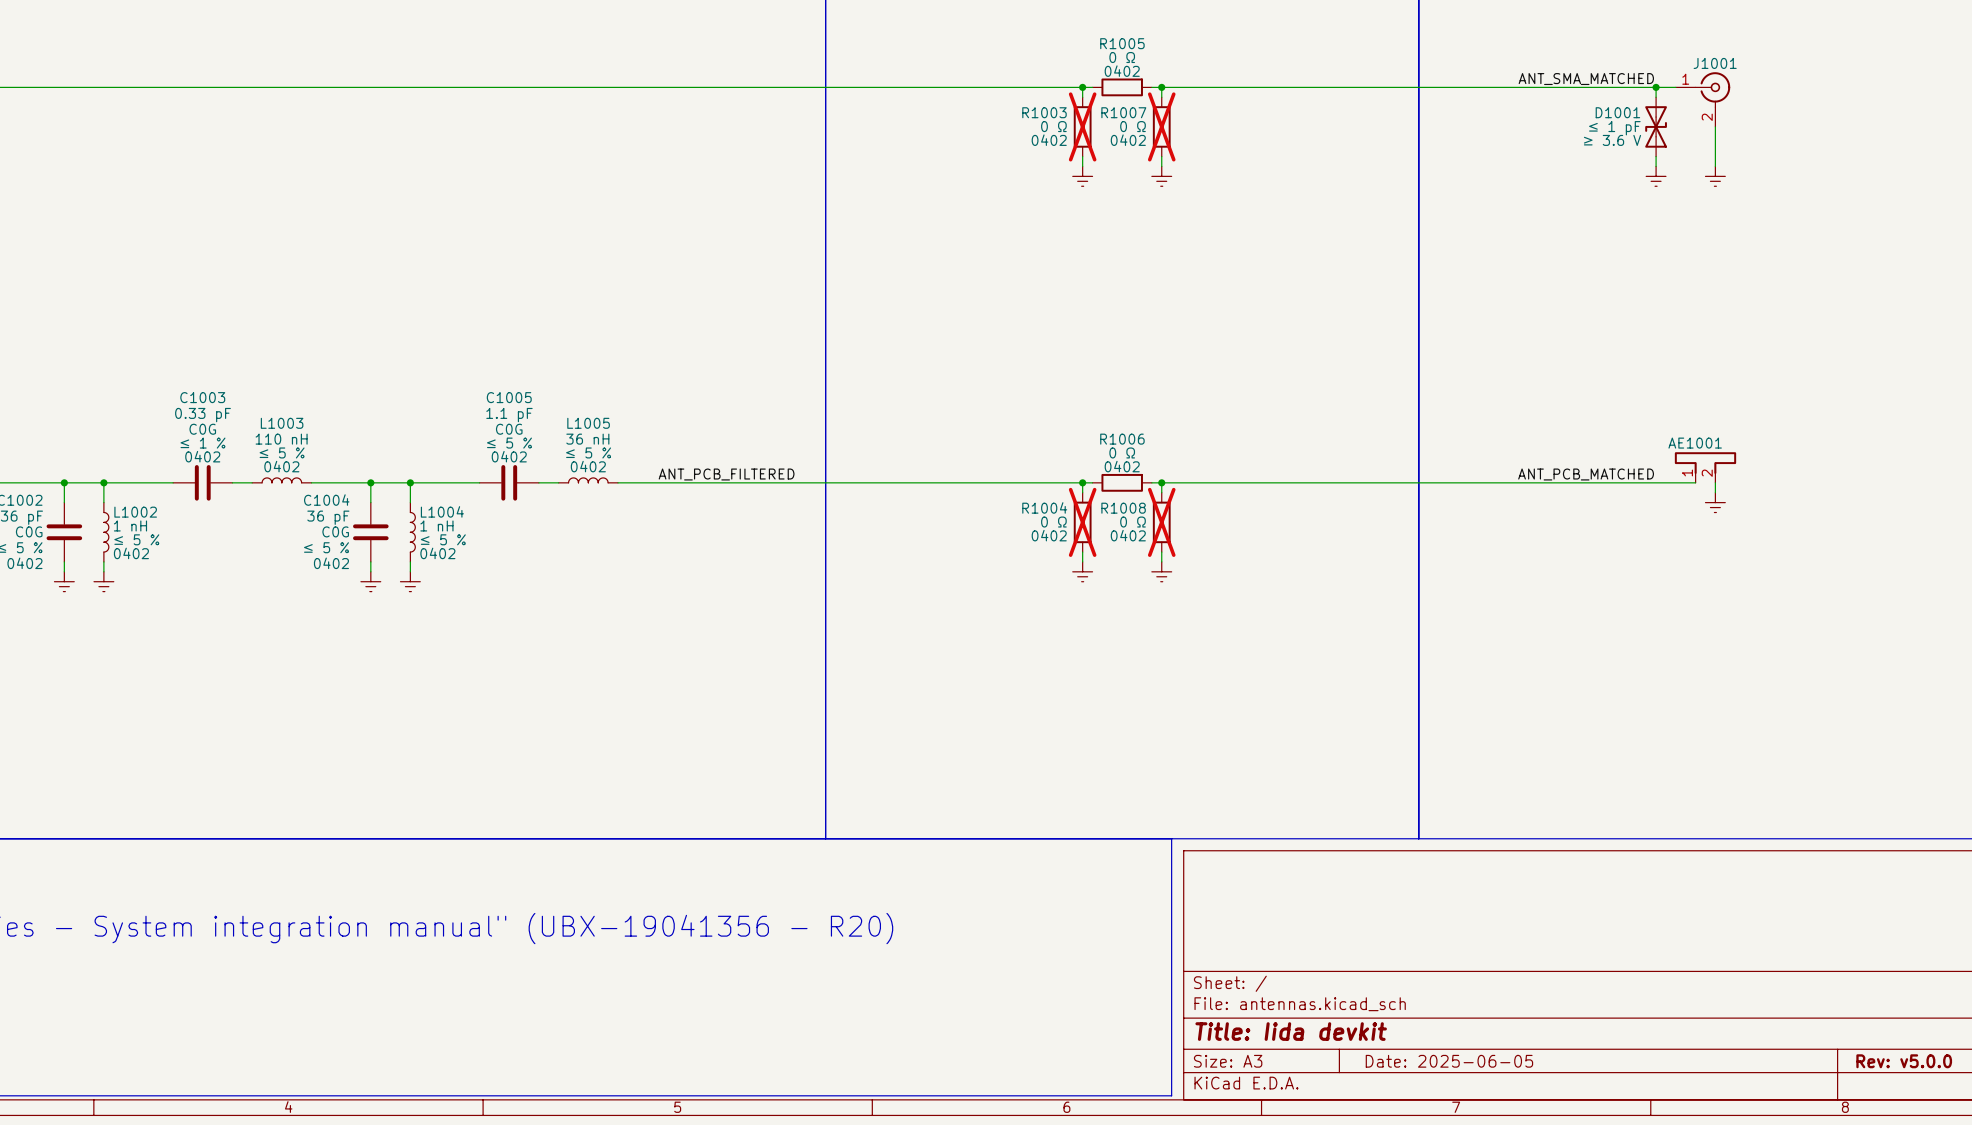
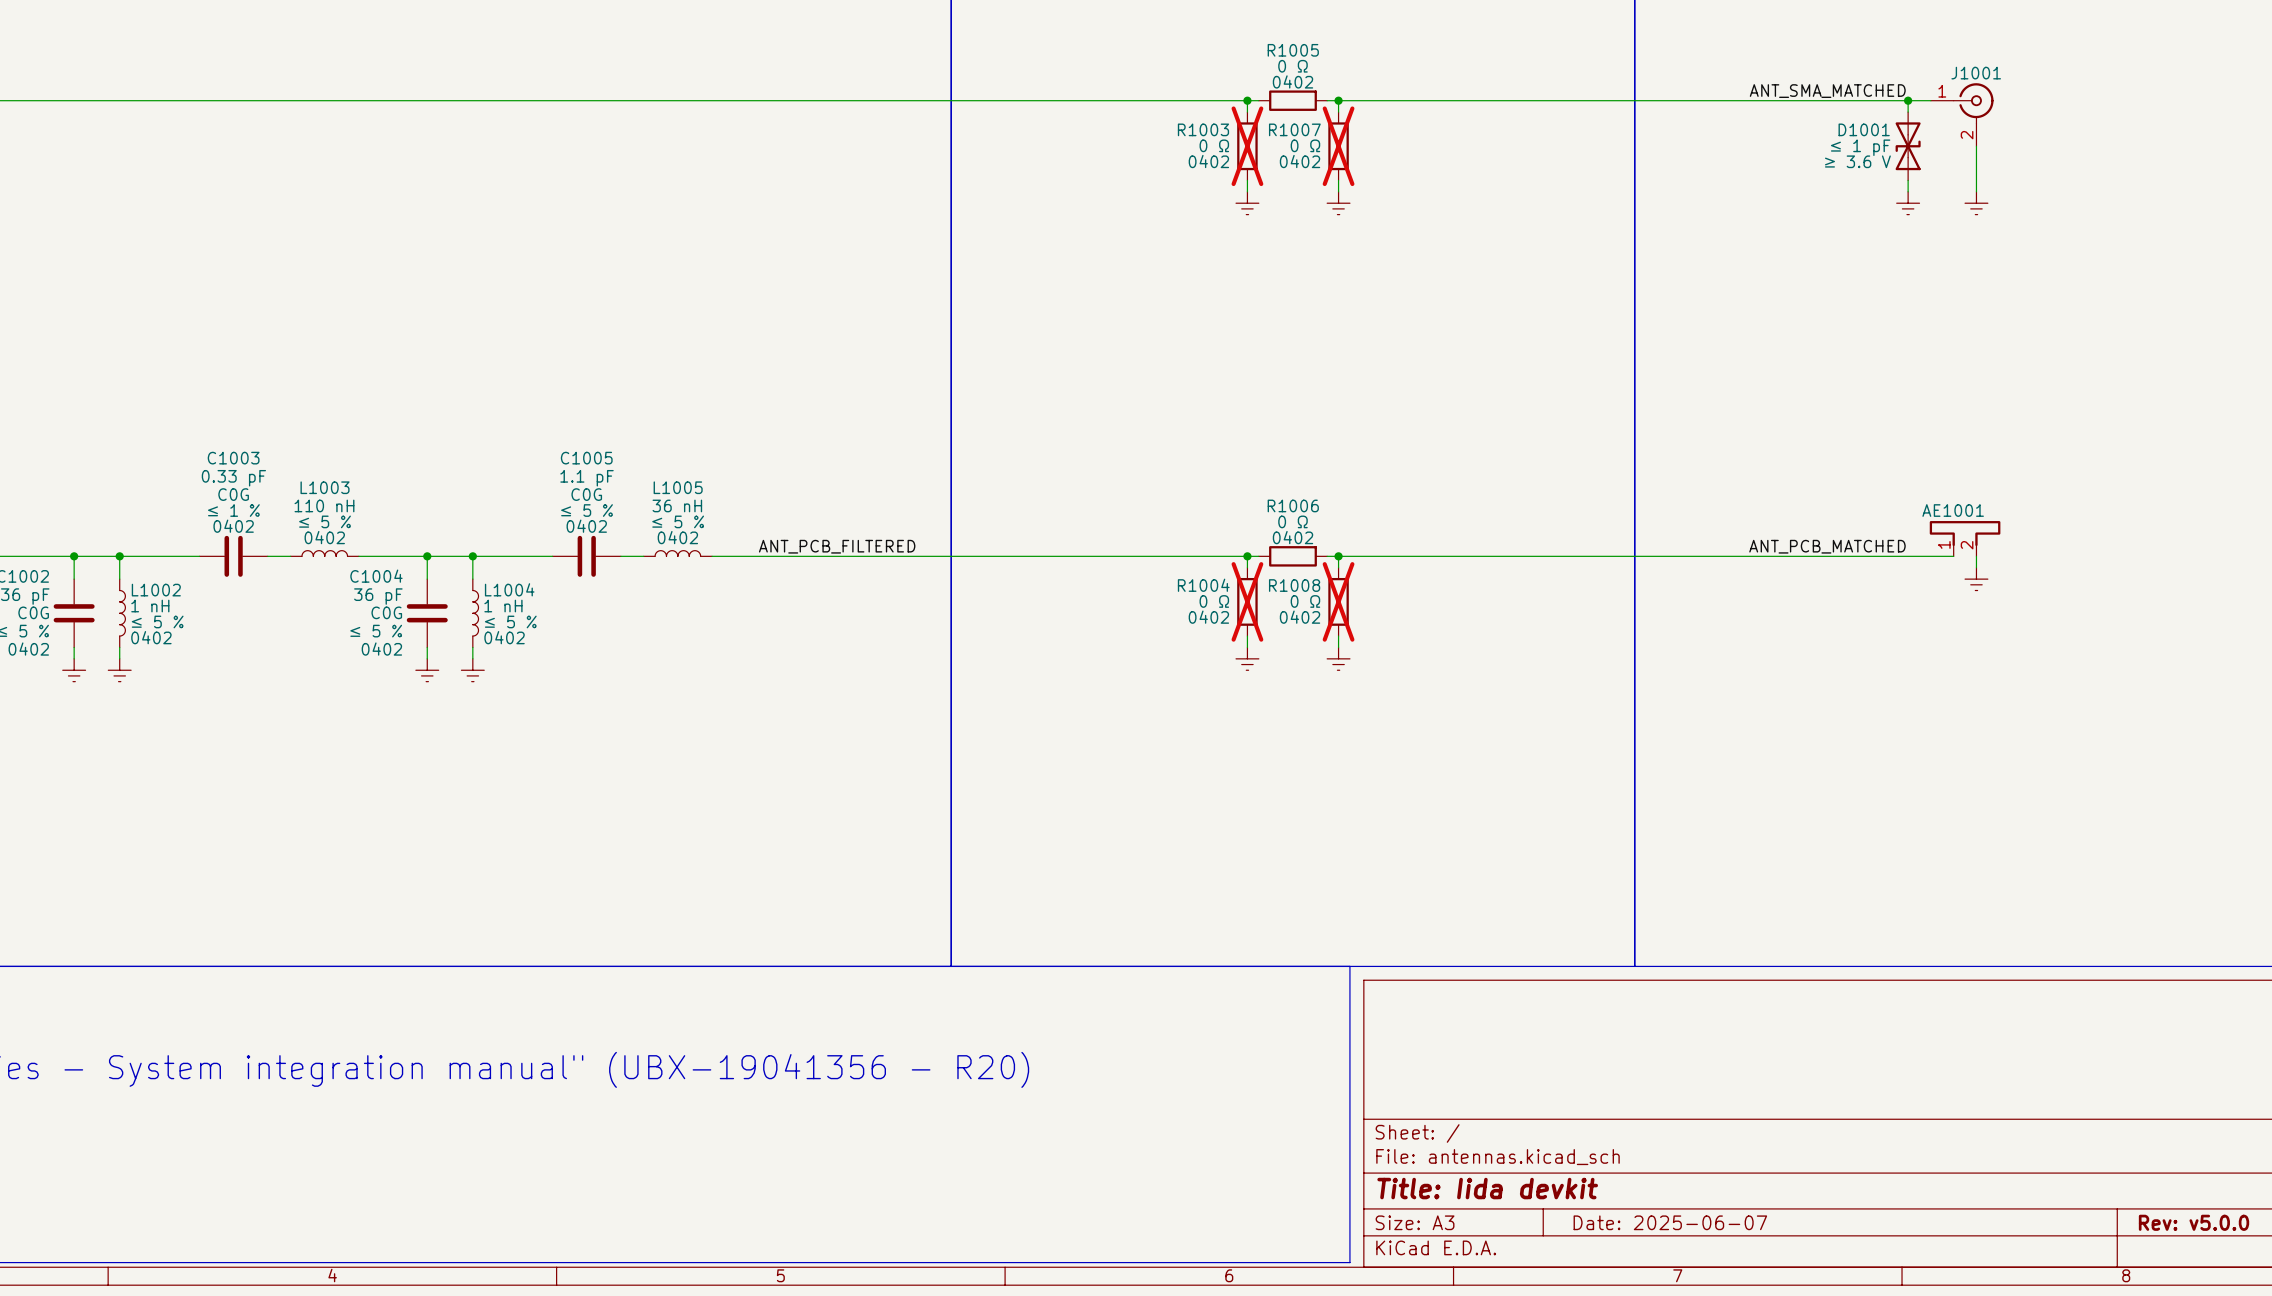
title block: Date: 2025-06-05 (1449, 1061) -> Date: 2025-06-07 (1670, 1222)

